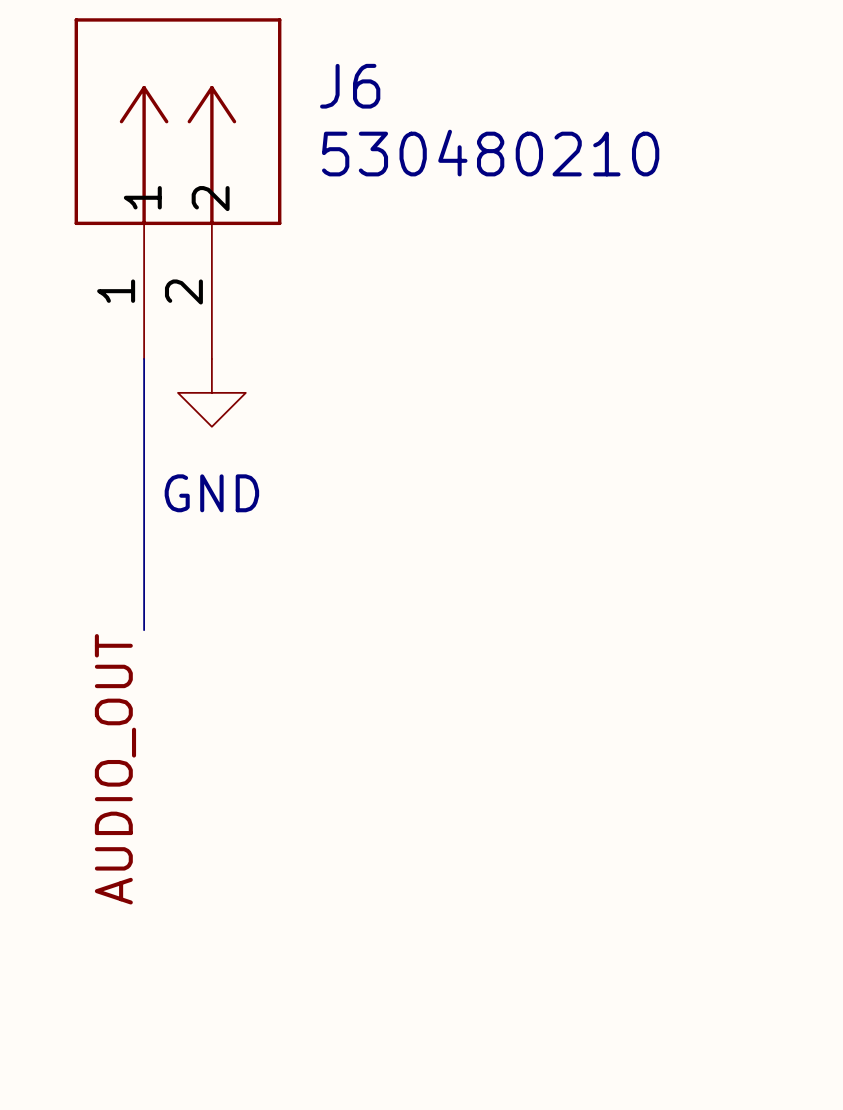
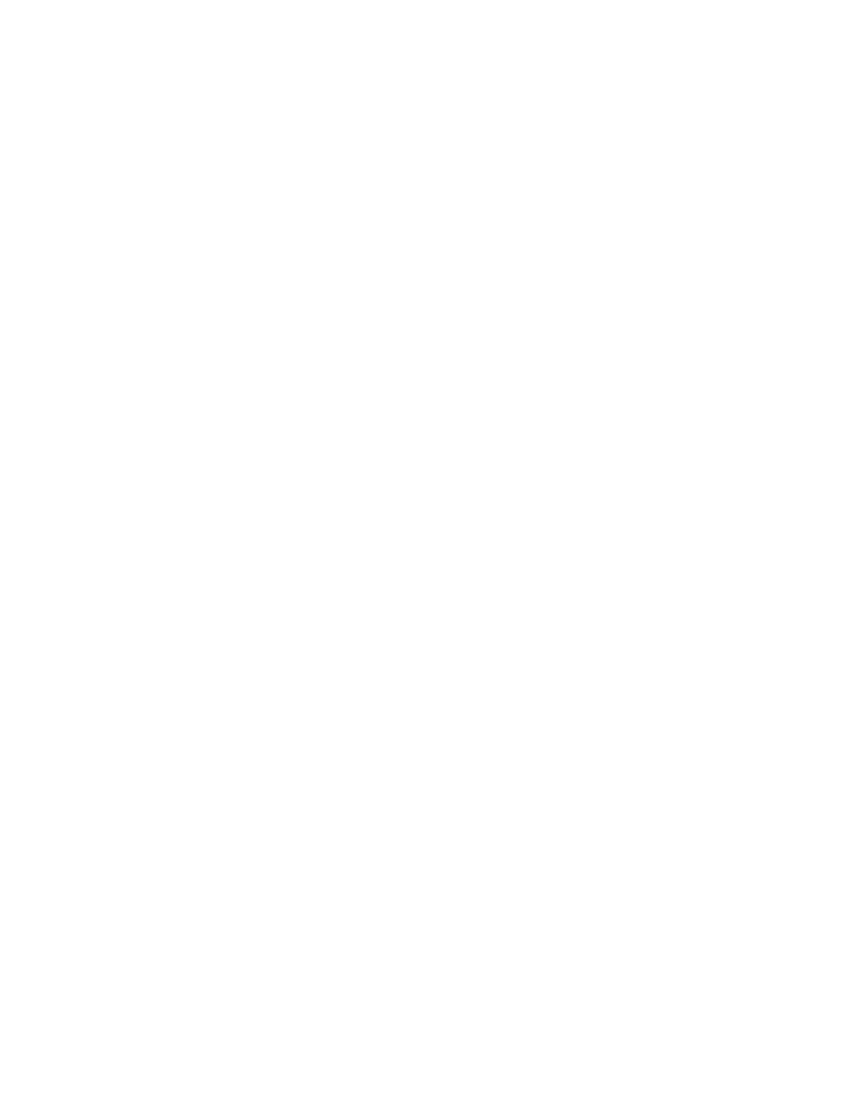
J6: 530480210 (178, 188) -> none
wire: (144, 358) (144, 630) -> none
power symbol: GND (211, 392) -> none
label: AUDIO_OUT (115, 769) -> none

